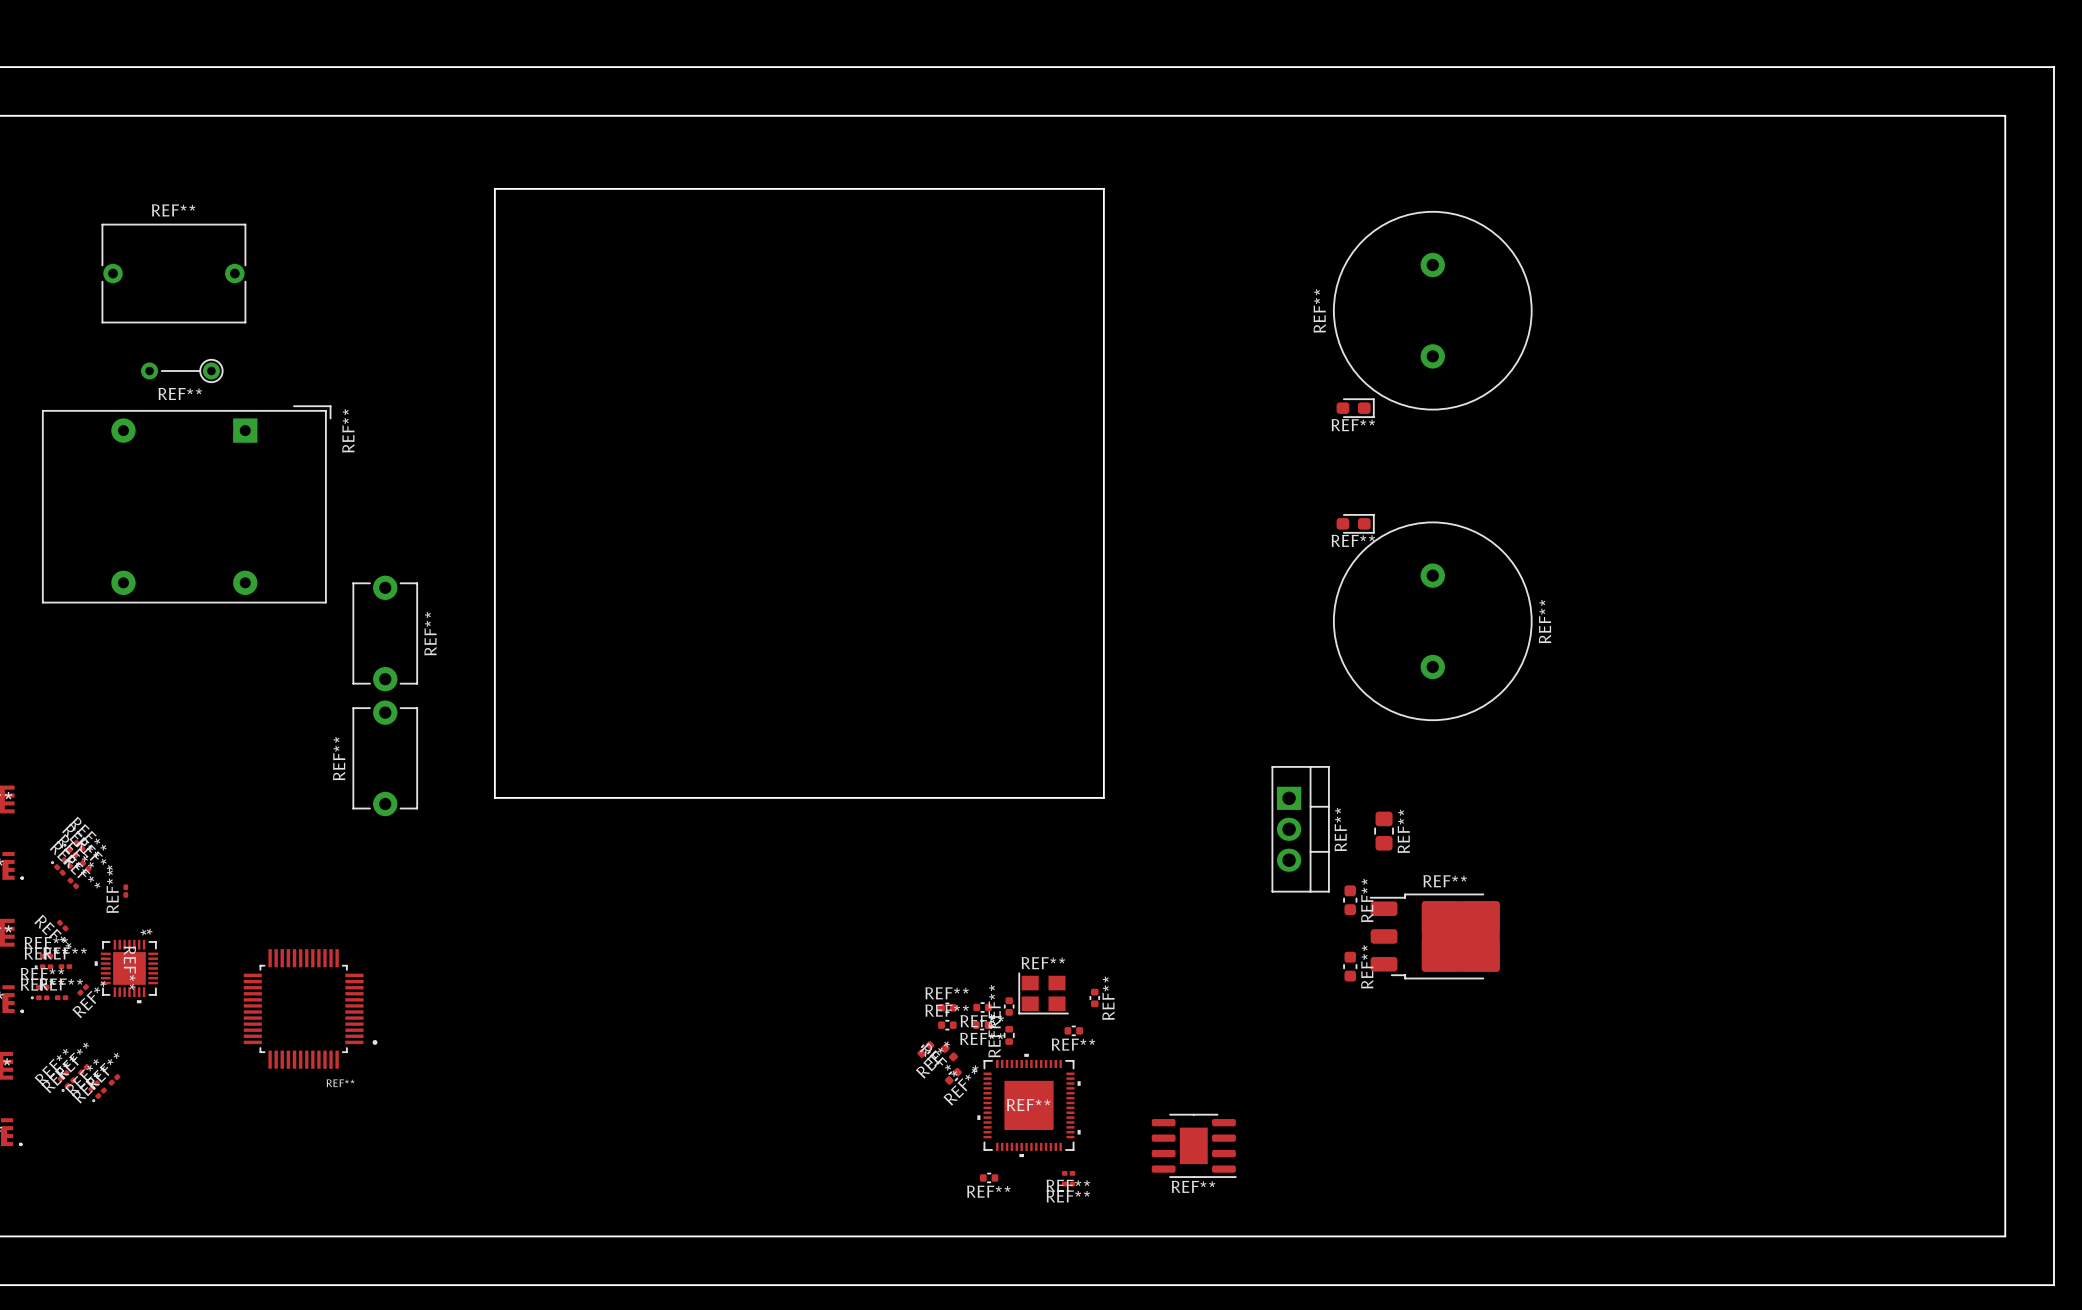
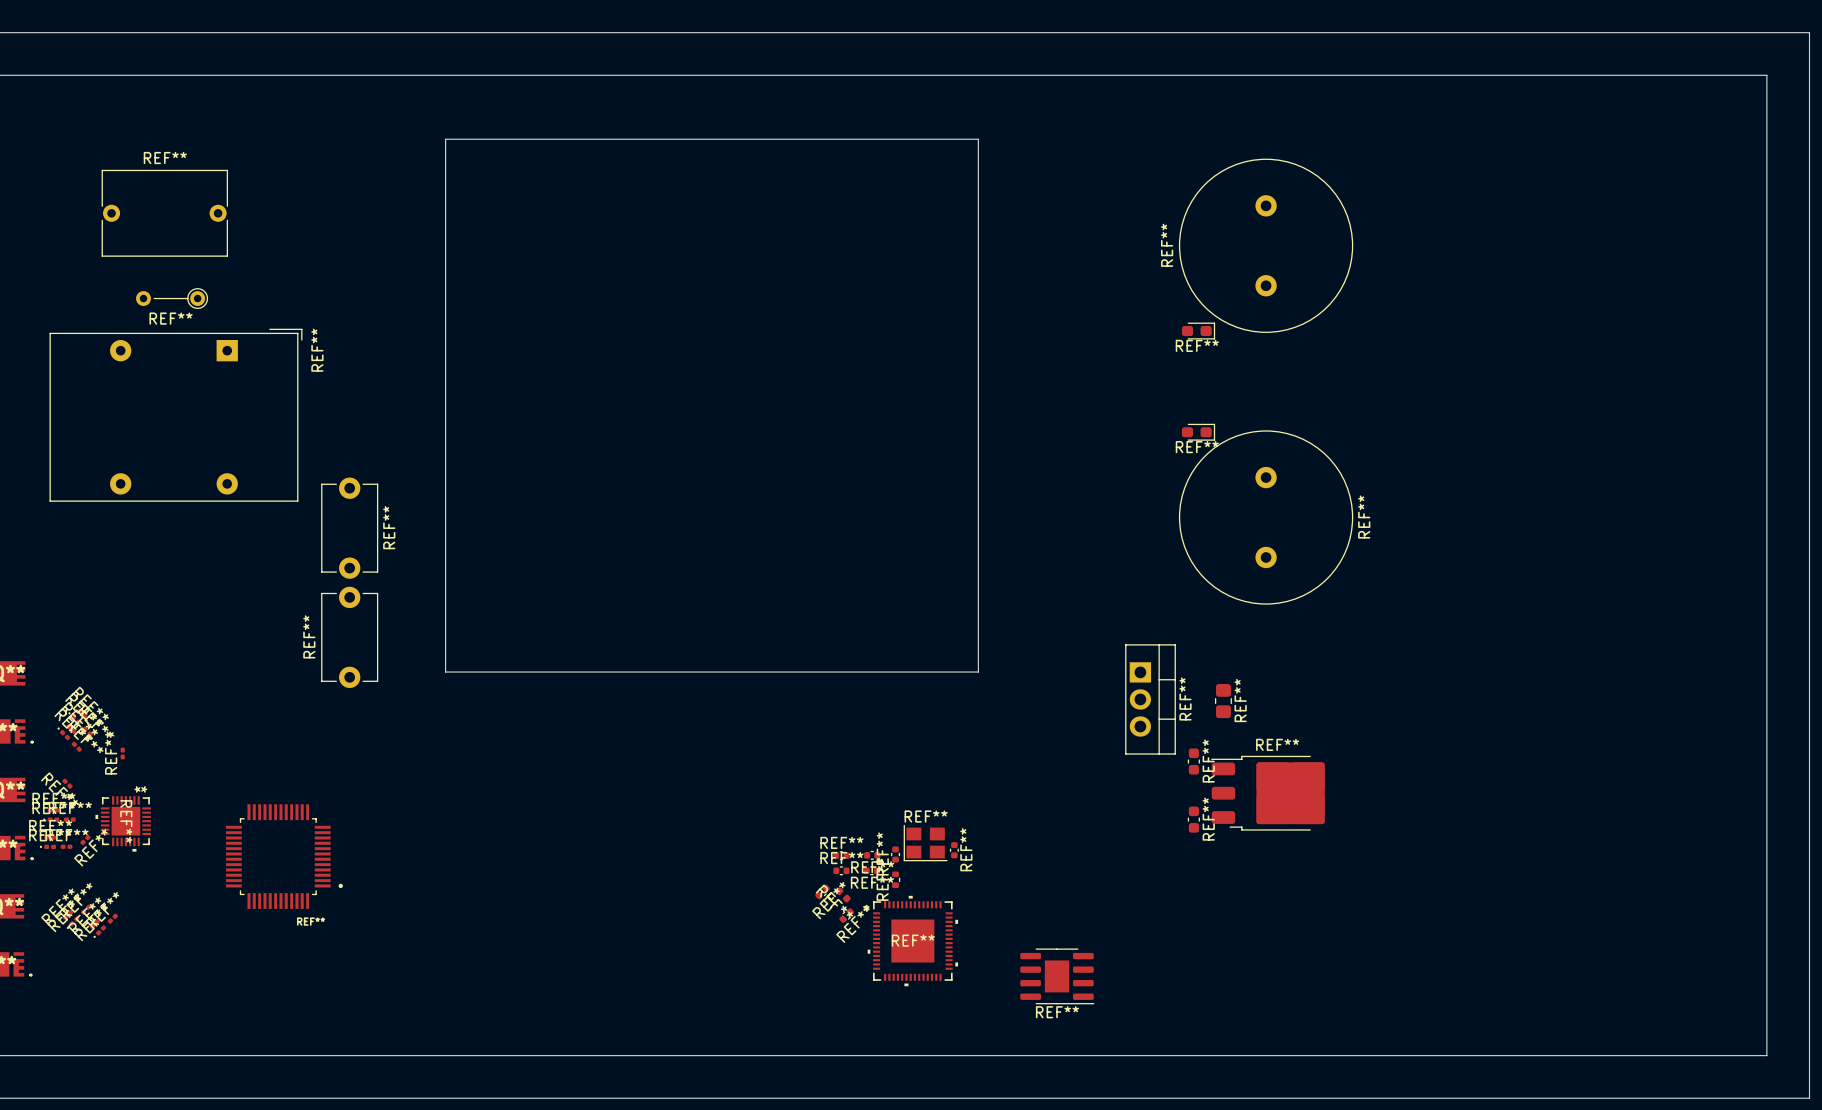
REF**: (1094, 997) -> none
REF**: none -> (954, 850)
REF**: (1073, 1030) -> none
REF**: (1068, 1173) -> none
REF**: (989, 1177) -> none
REF**: (1068, 1184) -> none

